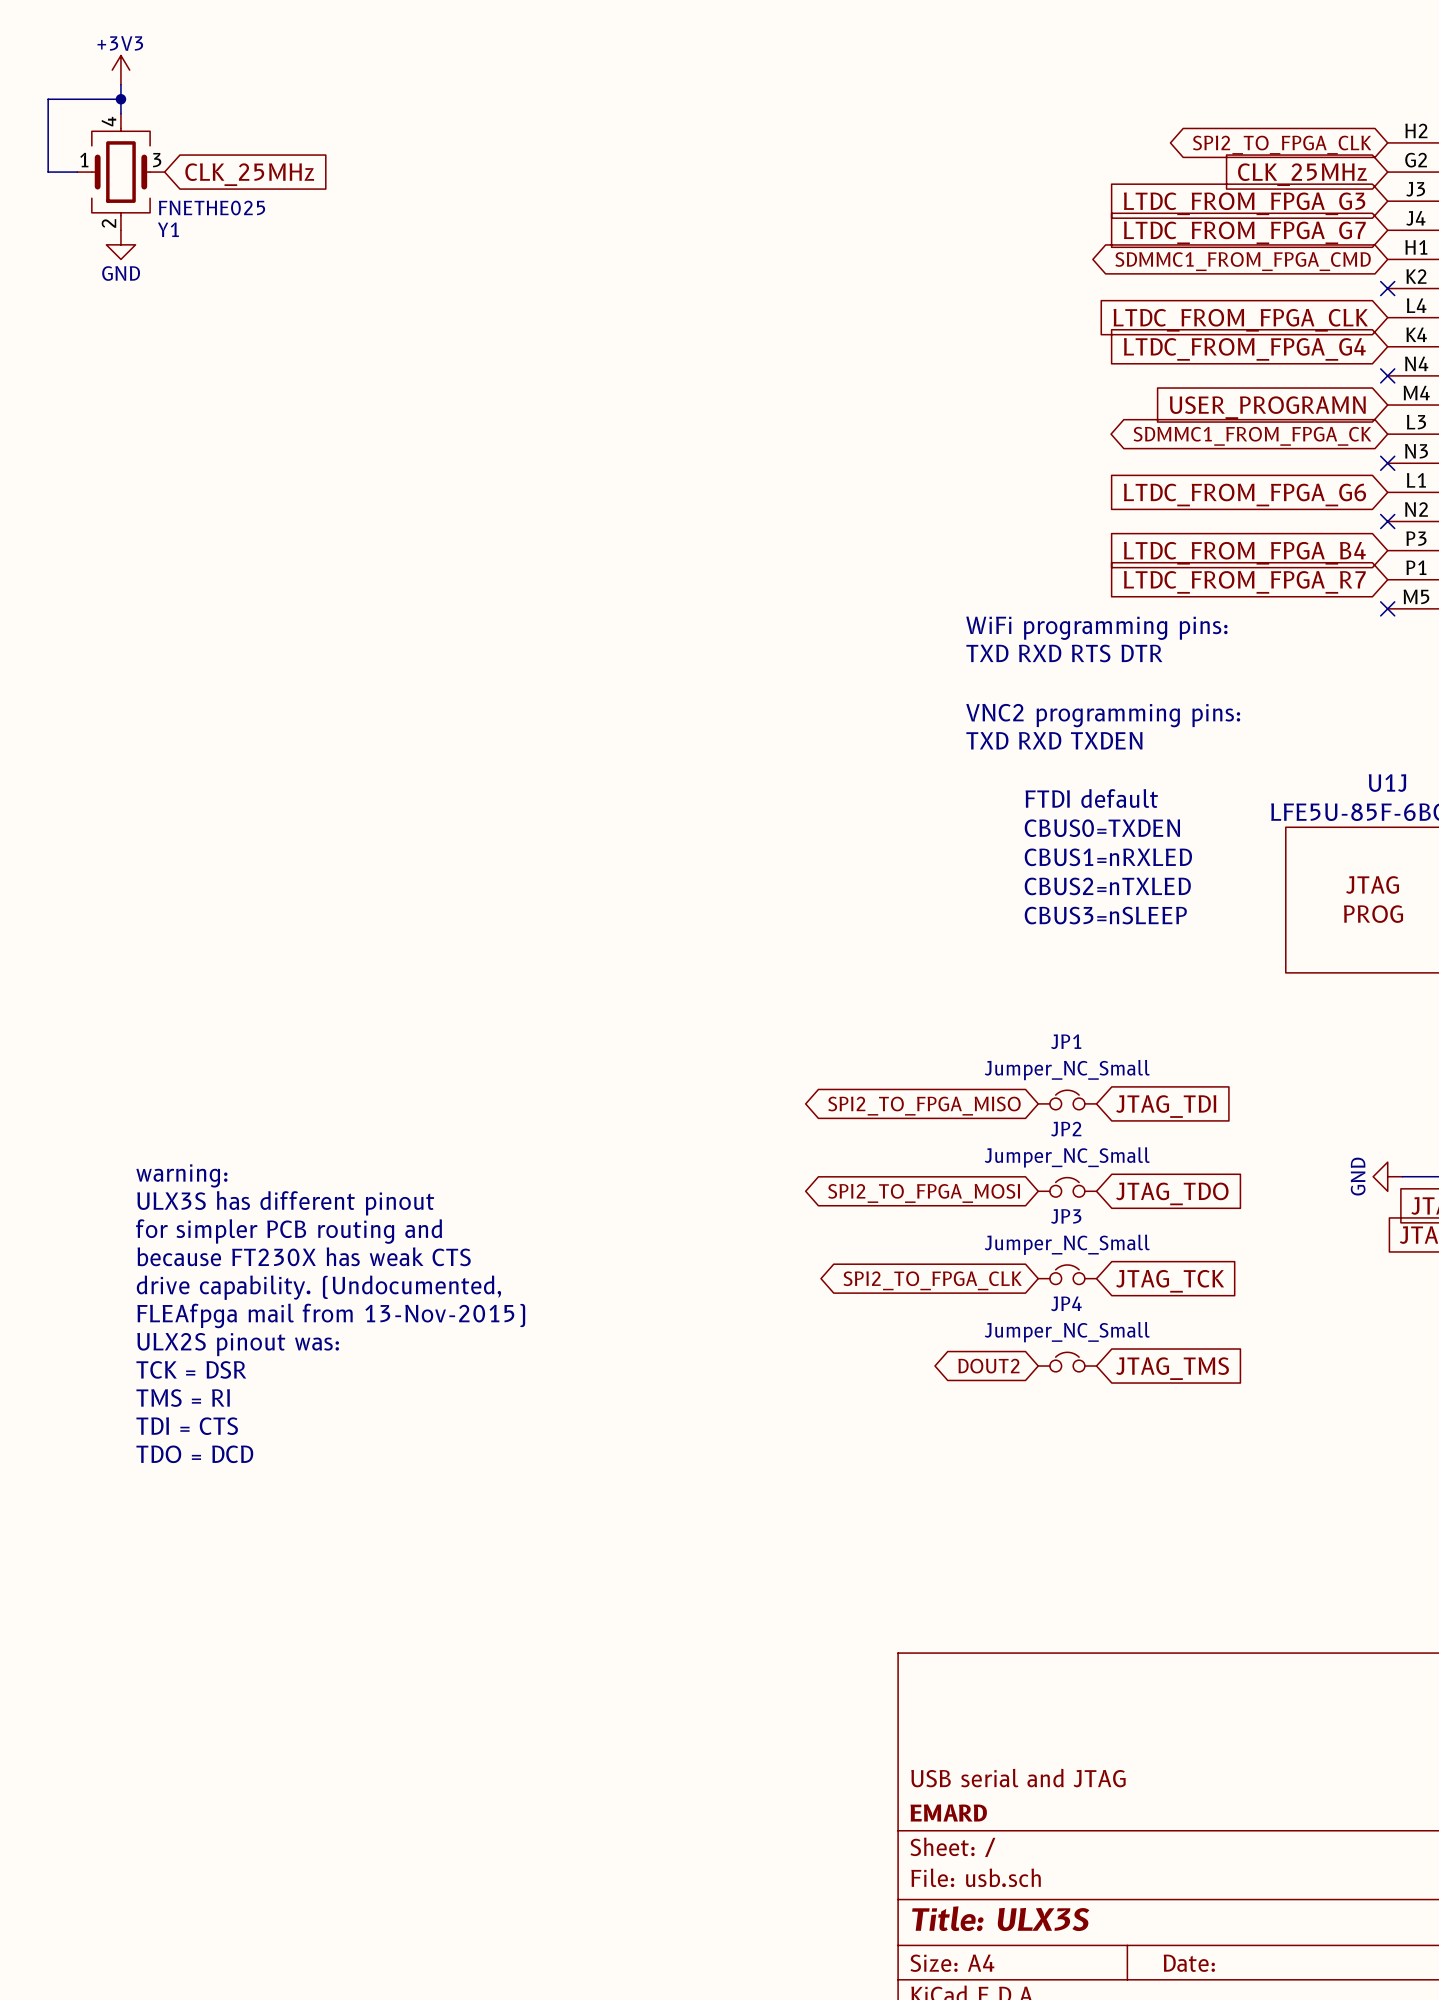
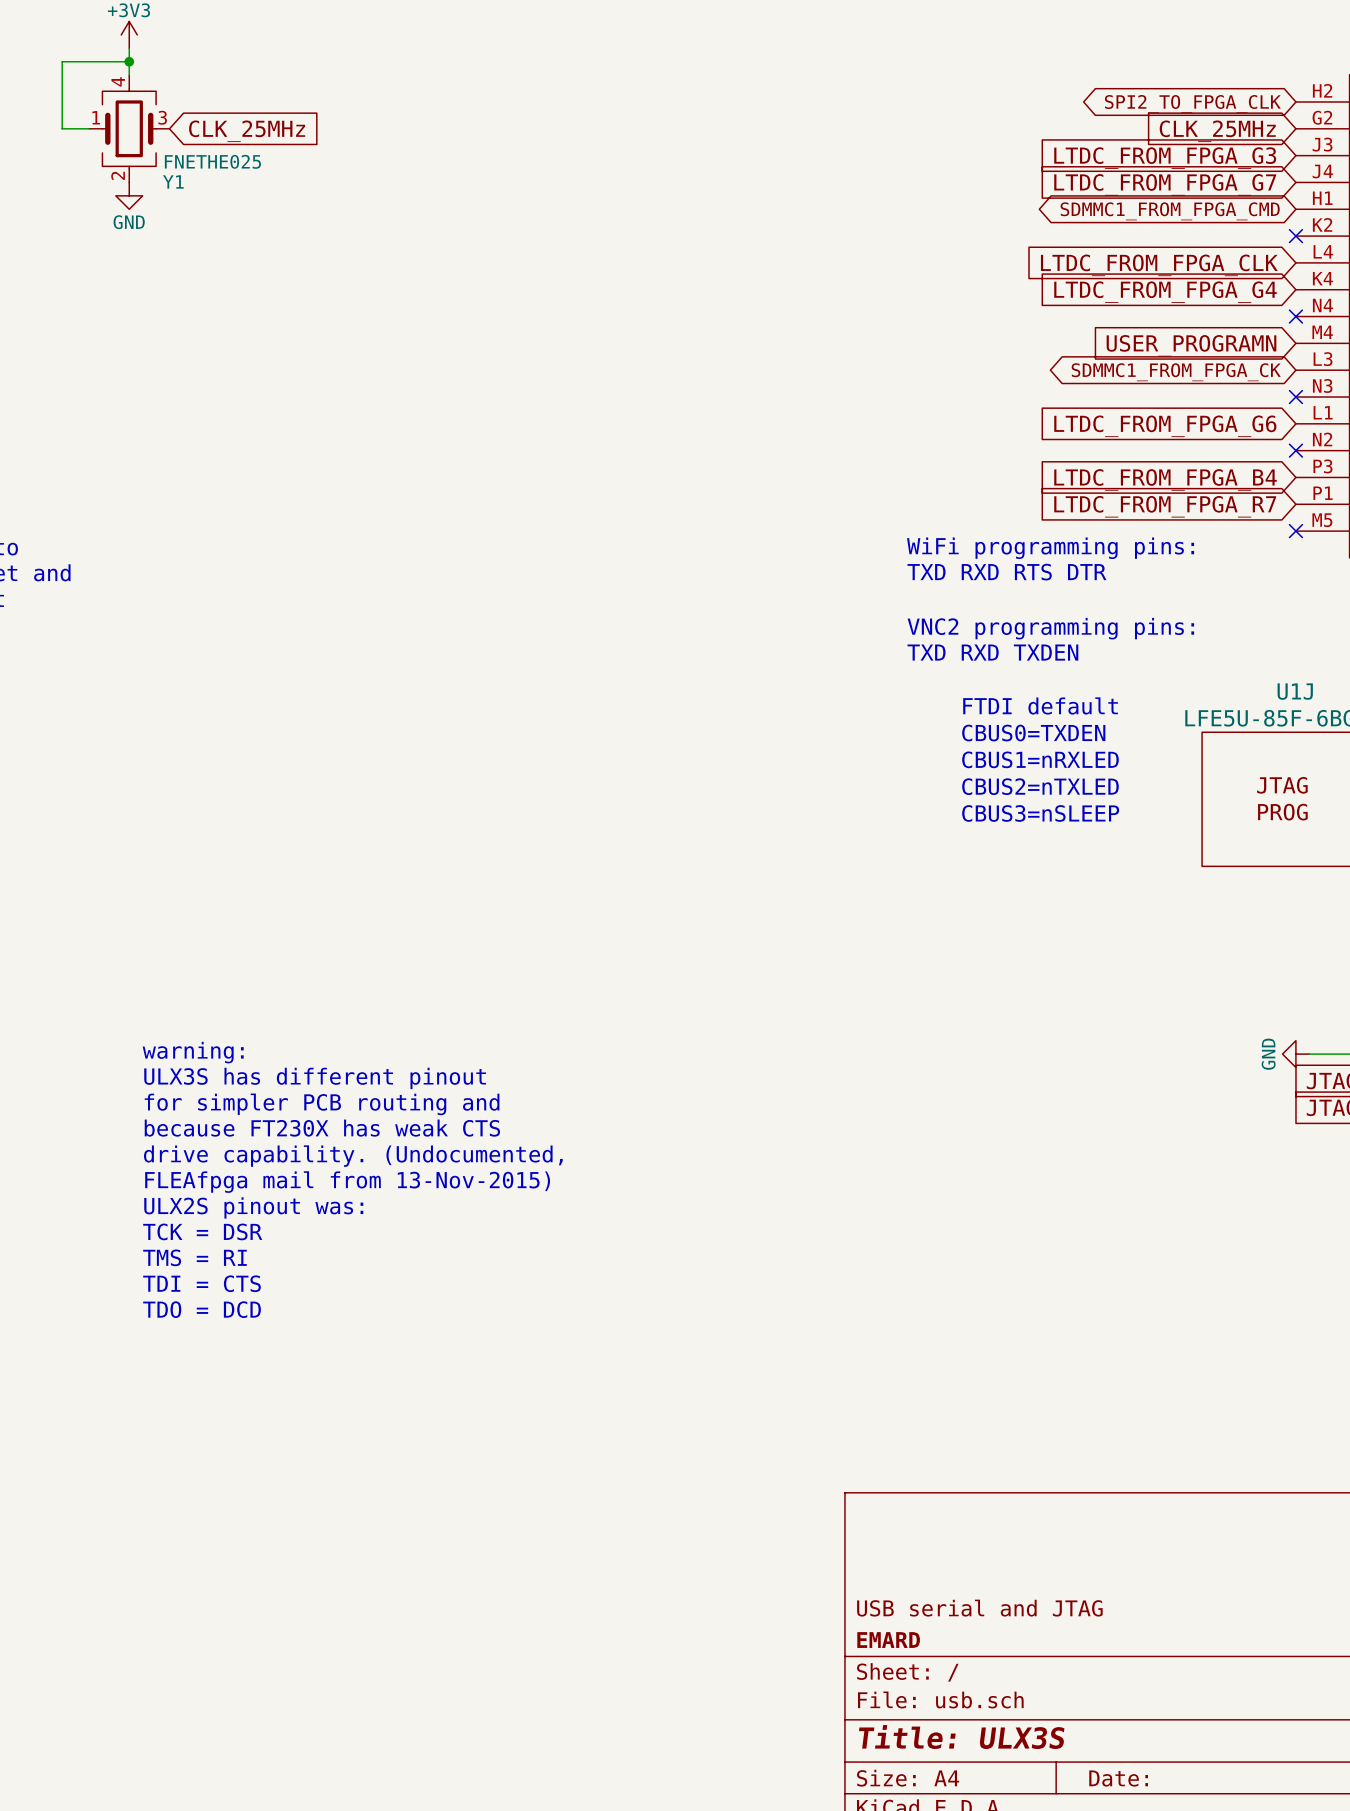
JP1: Jumper_NC_Small (1067, 1099) -> none
global label: SPI2_TO_FPGA_MISO (924, 1106) -> none
global label: JTAG_TDI (1166, 1106) -> none
JP2: Jumper_NC_Small (1067, 1187) -> none
global label: SPI2_TO_FPGA_MOSI (924, 1193) -> none
global label: JTAG_TDO (1172, 1193) -> none
JP3: Jumper_NC_Small (1067, 1274) -> none
global label: SPI2_TO_FPGA_CLK (932, 1280) -> none
global label: JTAG_TCK (1170, 1281) -> none
JP4: Jumper_NC_Small (1067, 1362) -> none
global label: DOUT2 (988, 1366) -> none
global label: JTAG_TMS (1172, 1368) -> none

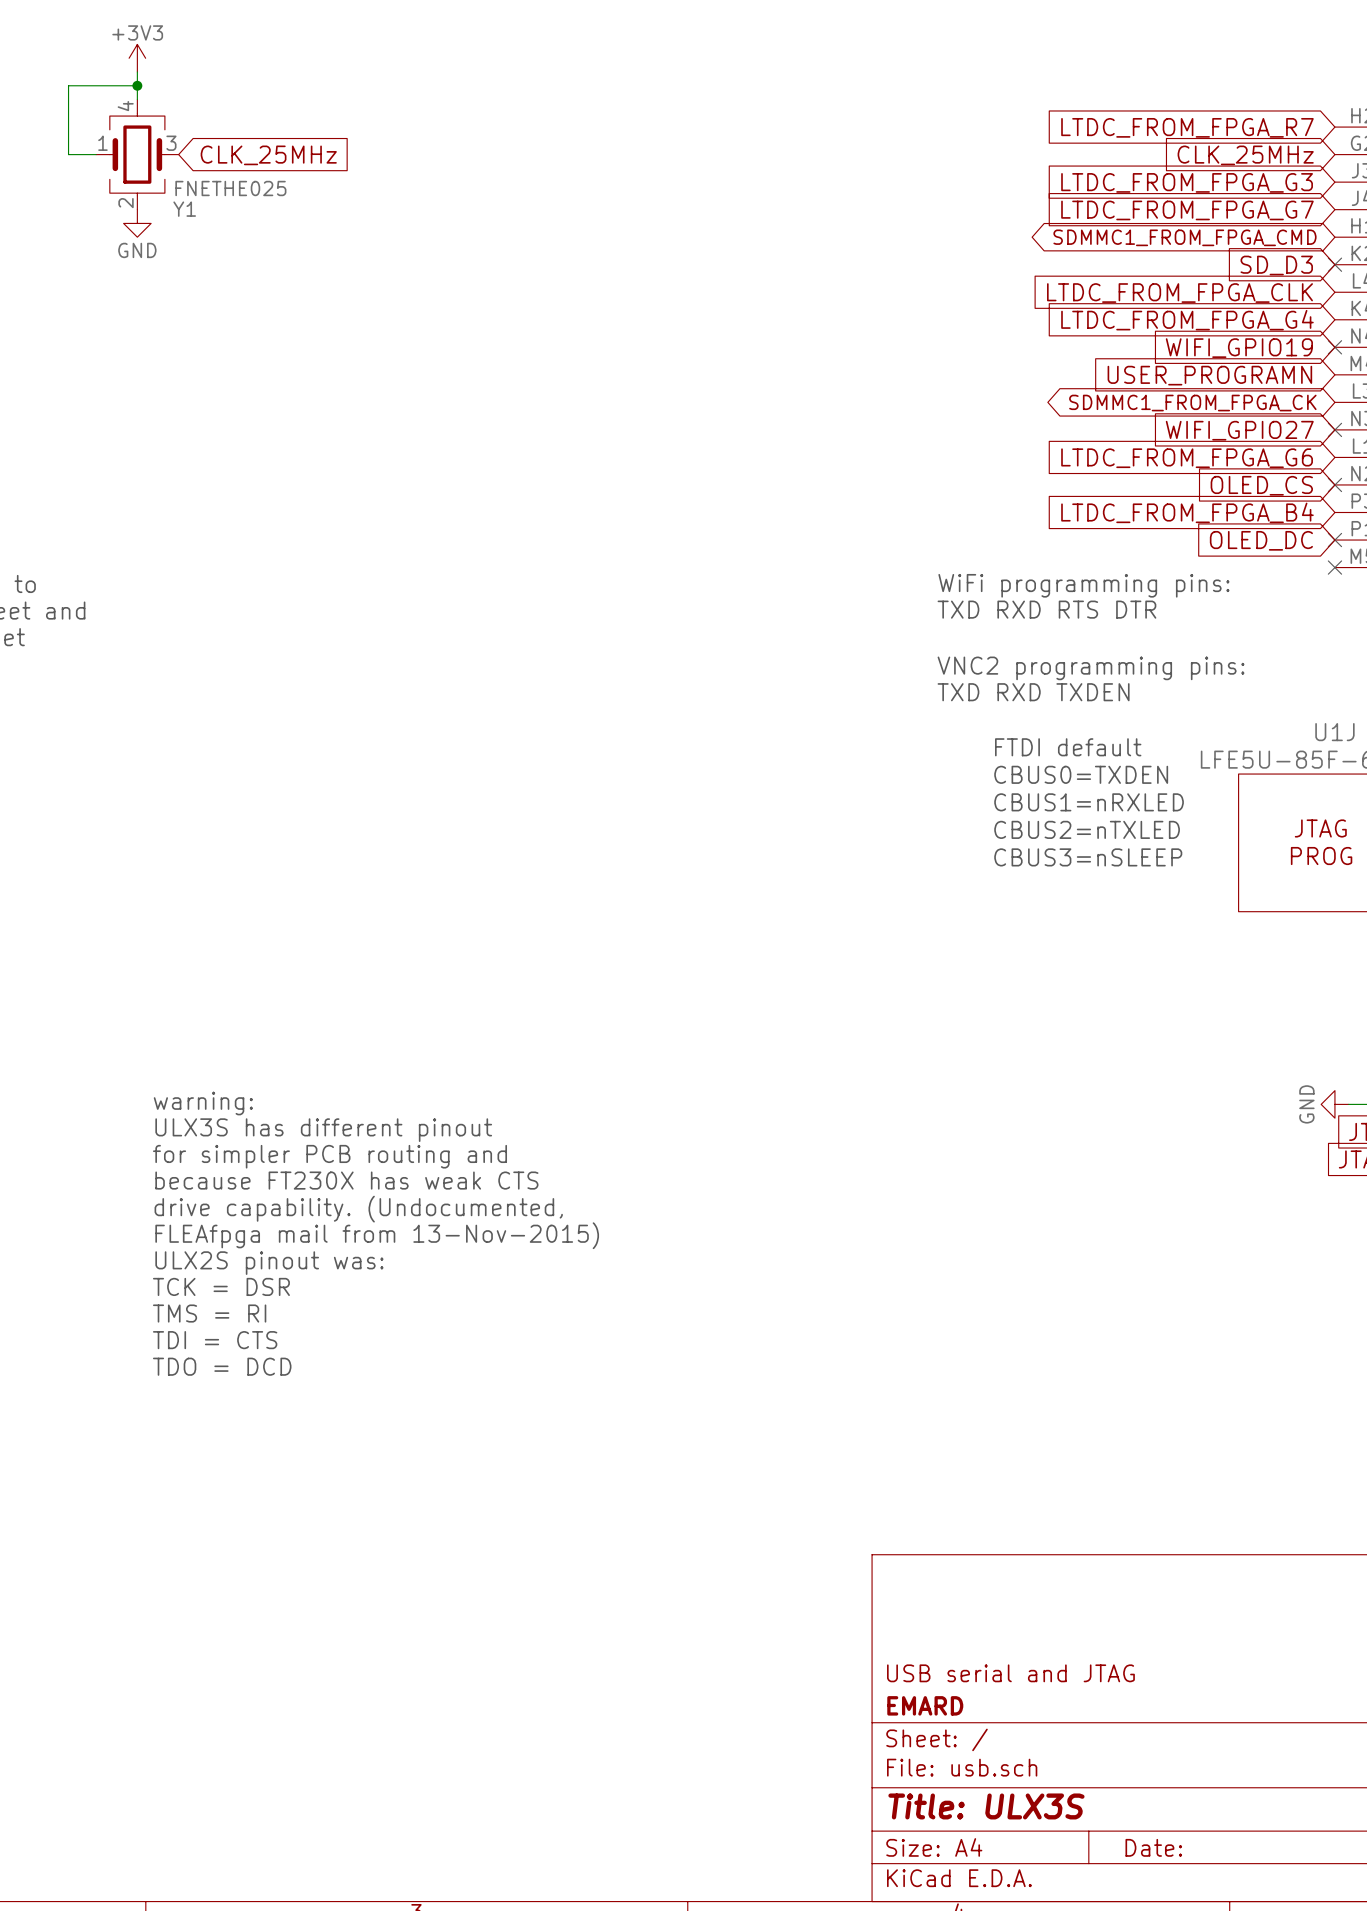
global label shape: bidirectional (1192, 104) -> input (1187, 127)
global label: SPI2_TO_FPGA_CLK (1192, 104) -> LTDC_FROM_FPGA_R7 (1187, 127)
global label: none -> SD_D3 (1276, 265)
global label: none -> WIFI_GPIO19 (1239, 348)
global label: none -> WIFI_GPIO27 (1239, 430)
global label: none -> OLED_CS (1261, 485)
no-connect mark: none -> (1334, 540)
global label: LTDC_FROM_FPGA_R7 (1165, 506) -> OLED_DC (1261, 540)

